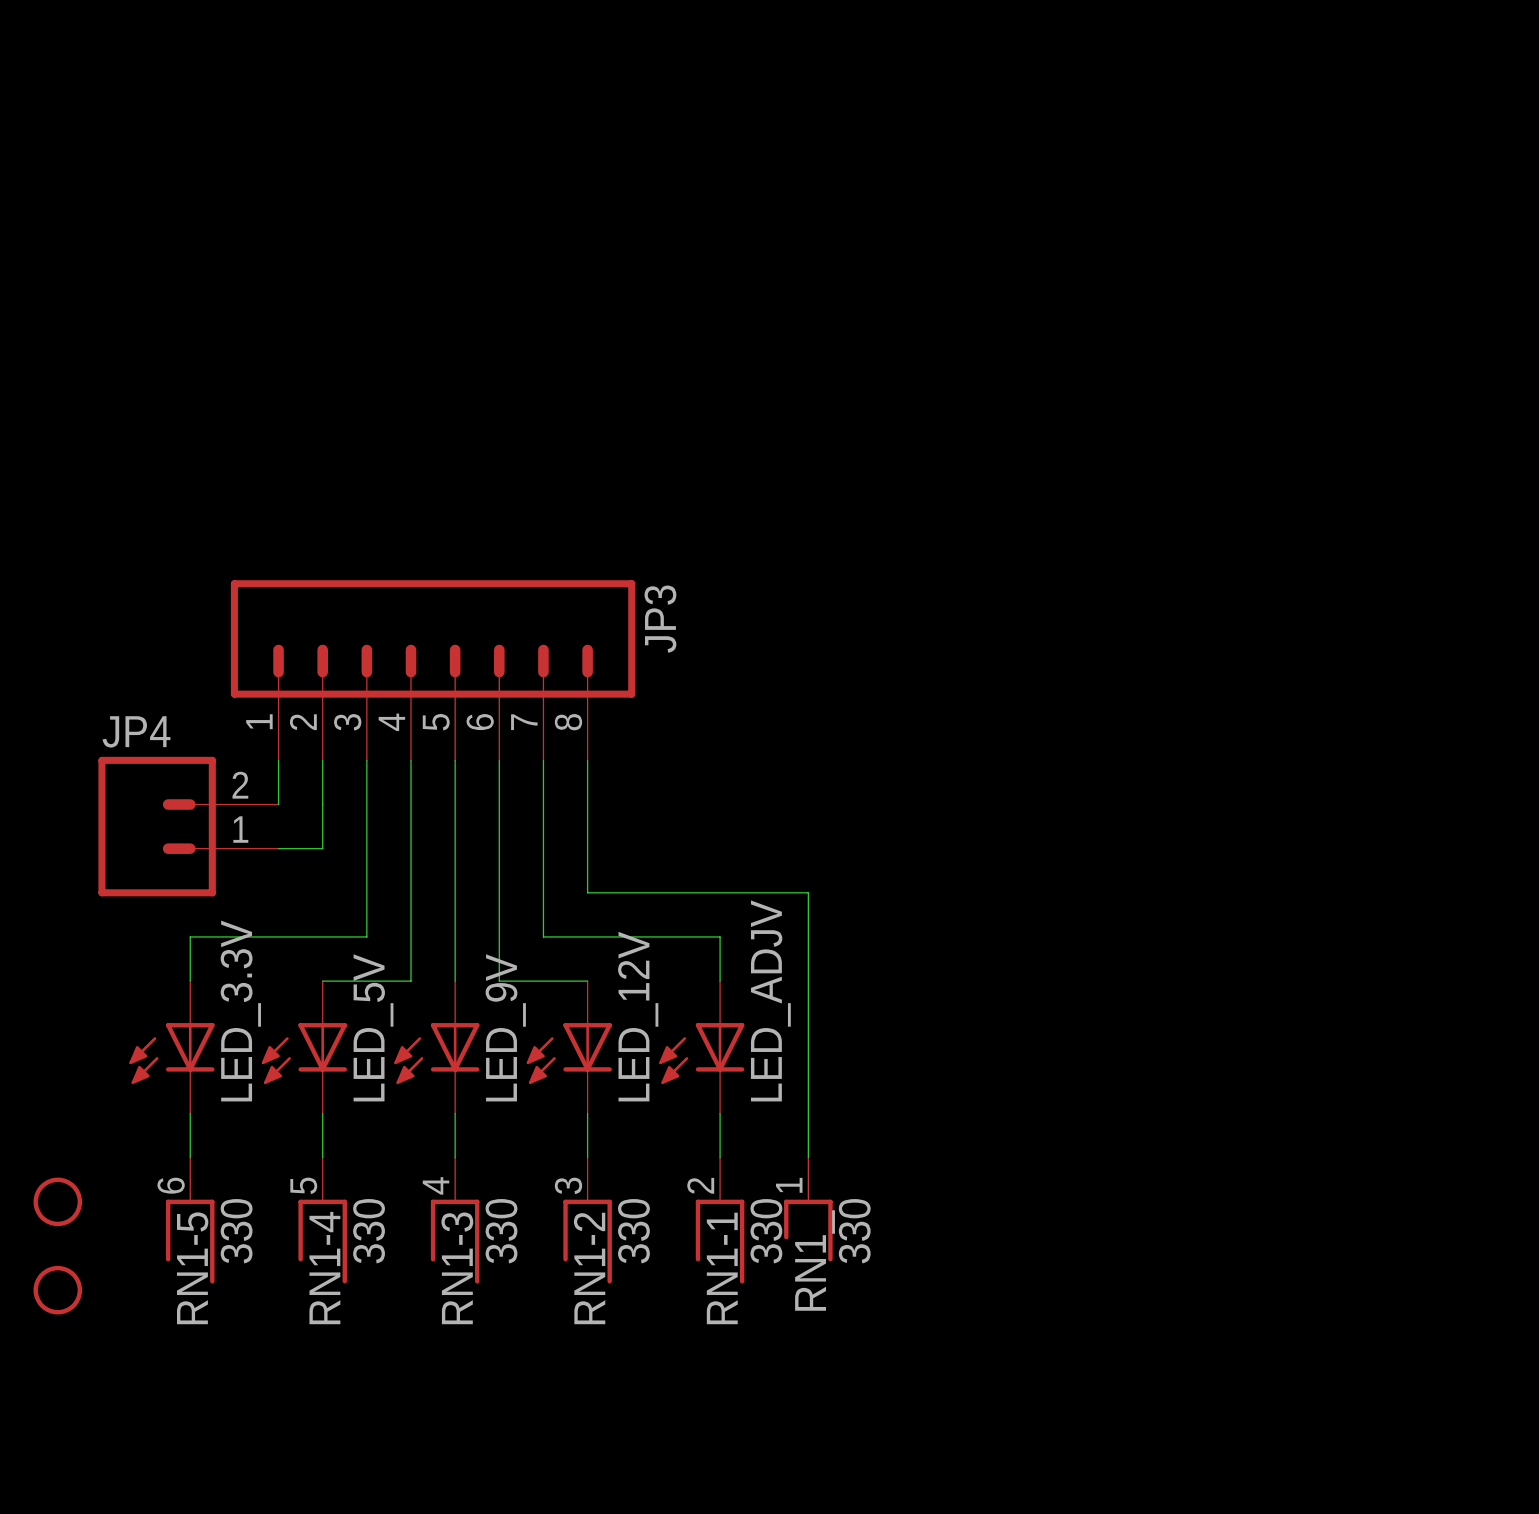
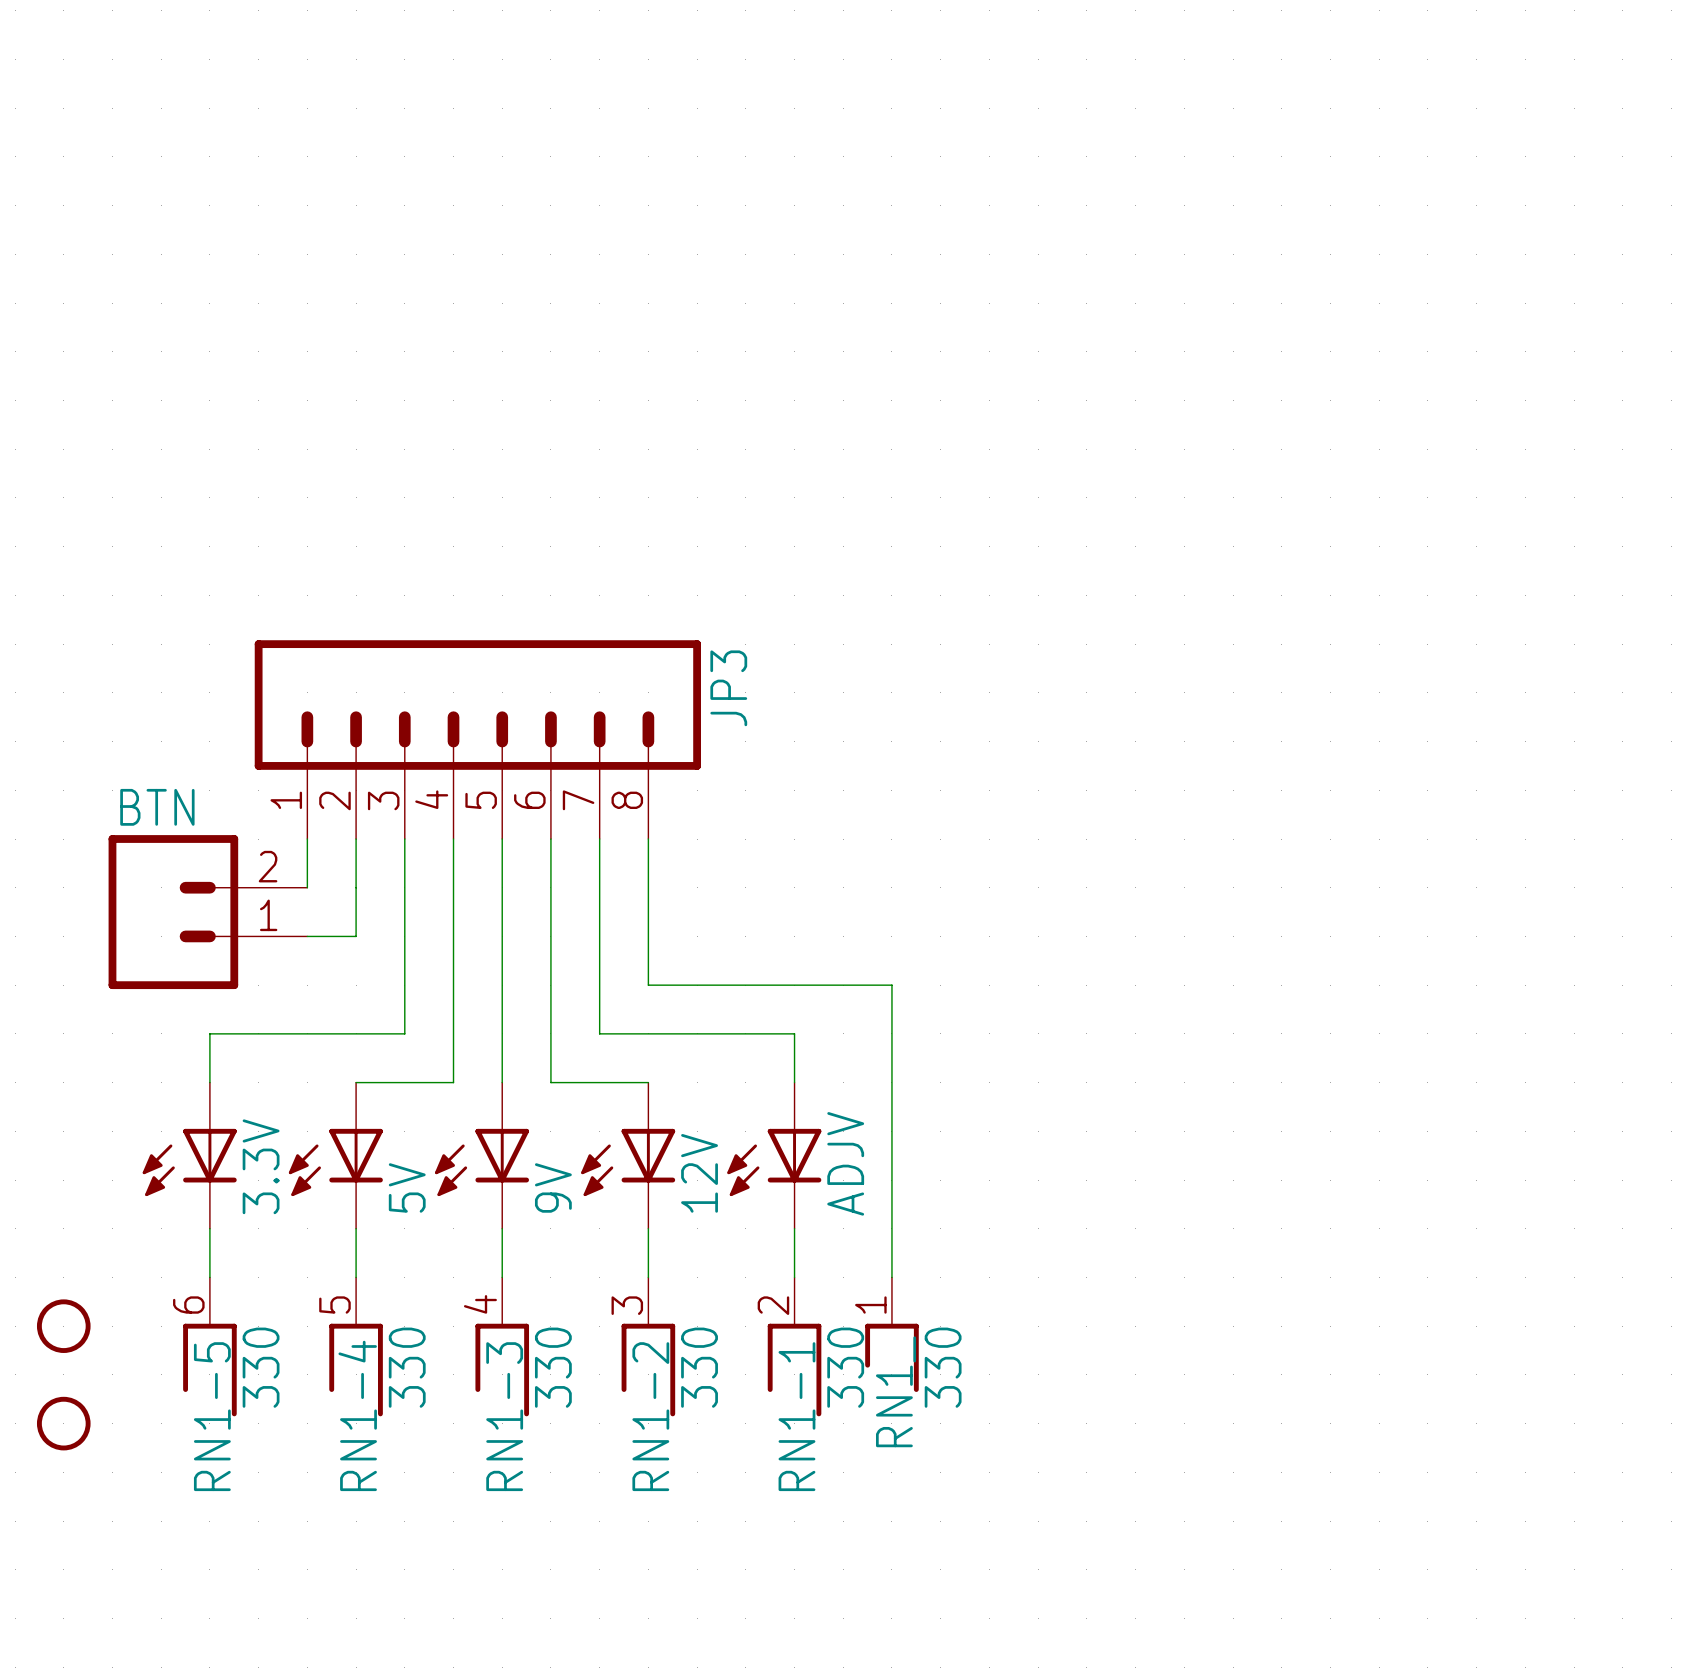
JP4 name: JP4 (136, 731) -> BTN (157, 807)
LED_ADJV name: LED_ADJV (770, 1000) -> ADJV (845, 1163)
LED_3.3V name: LED_3.3V (240, 1011) -> 3.3V (261, 1166)
LED_12V name: LED_12V (638, 1016) -> 12V (699, 1173)
LED_5V name: LED_5V (373, 1027) -> 5V (407, 1187)
LED_9V name: LED_9V (505, 1027) -> 9V (553, 1187)

